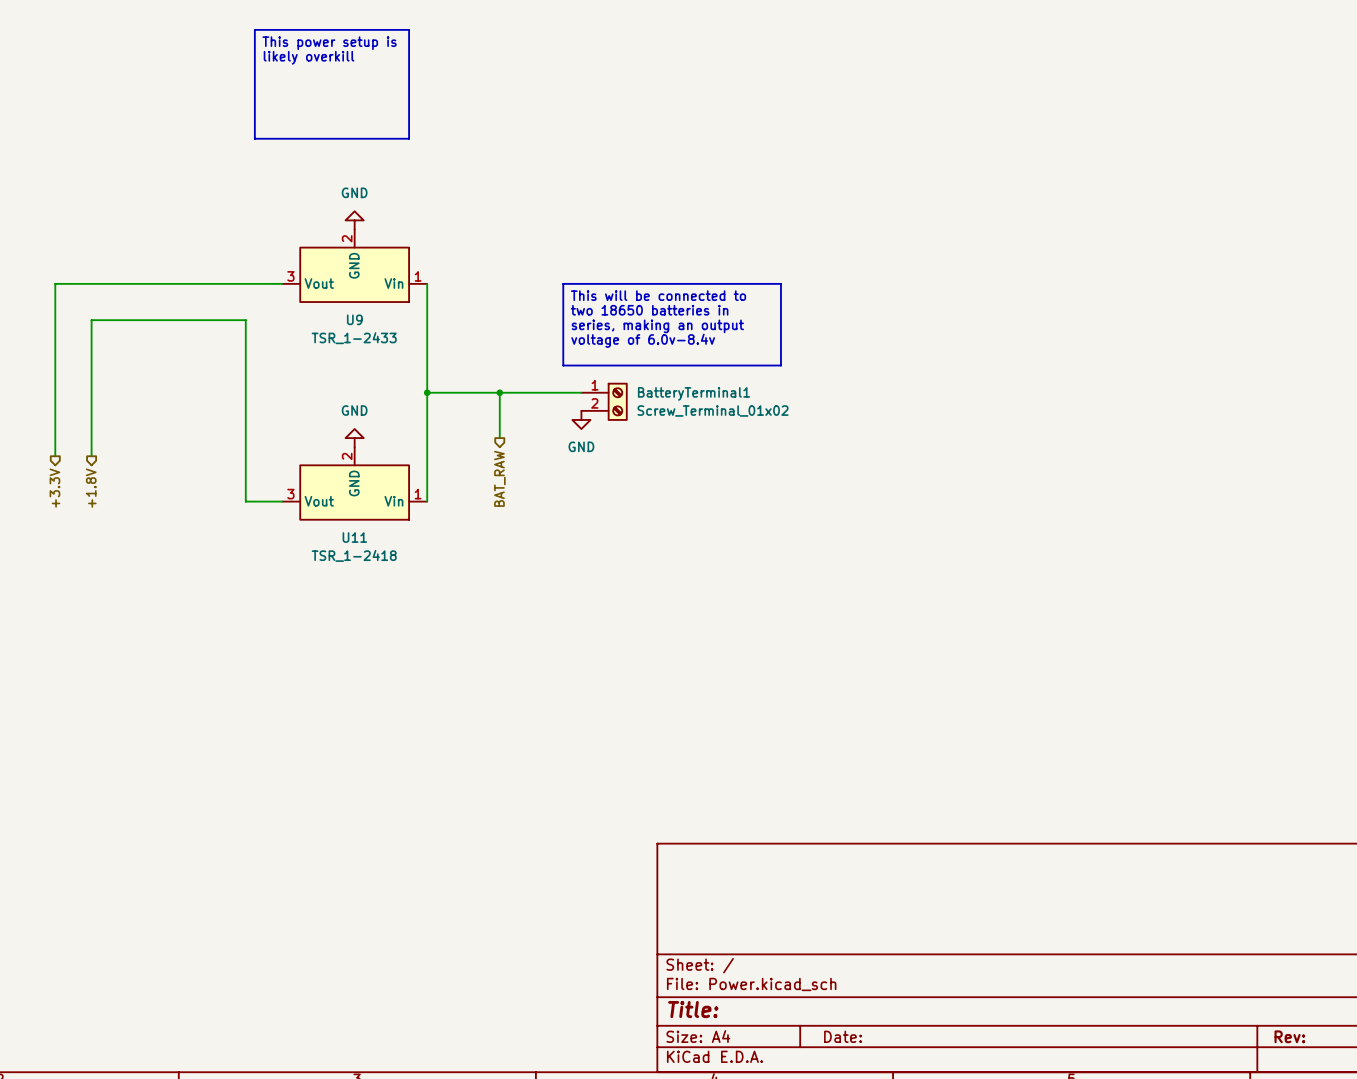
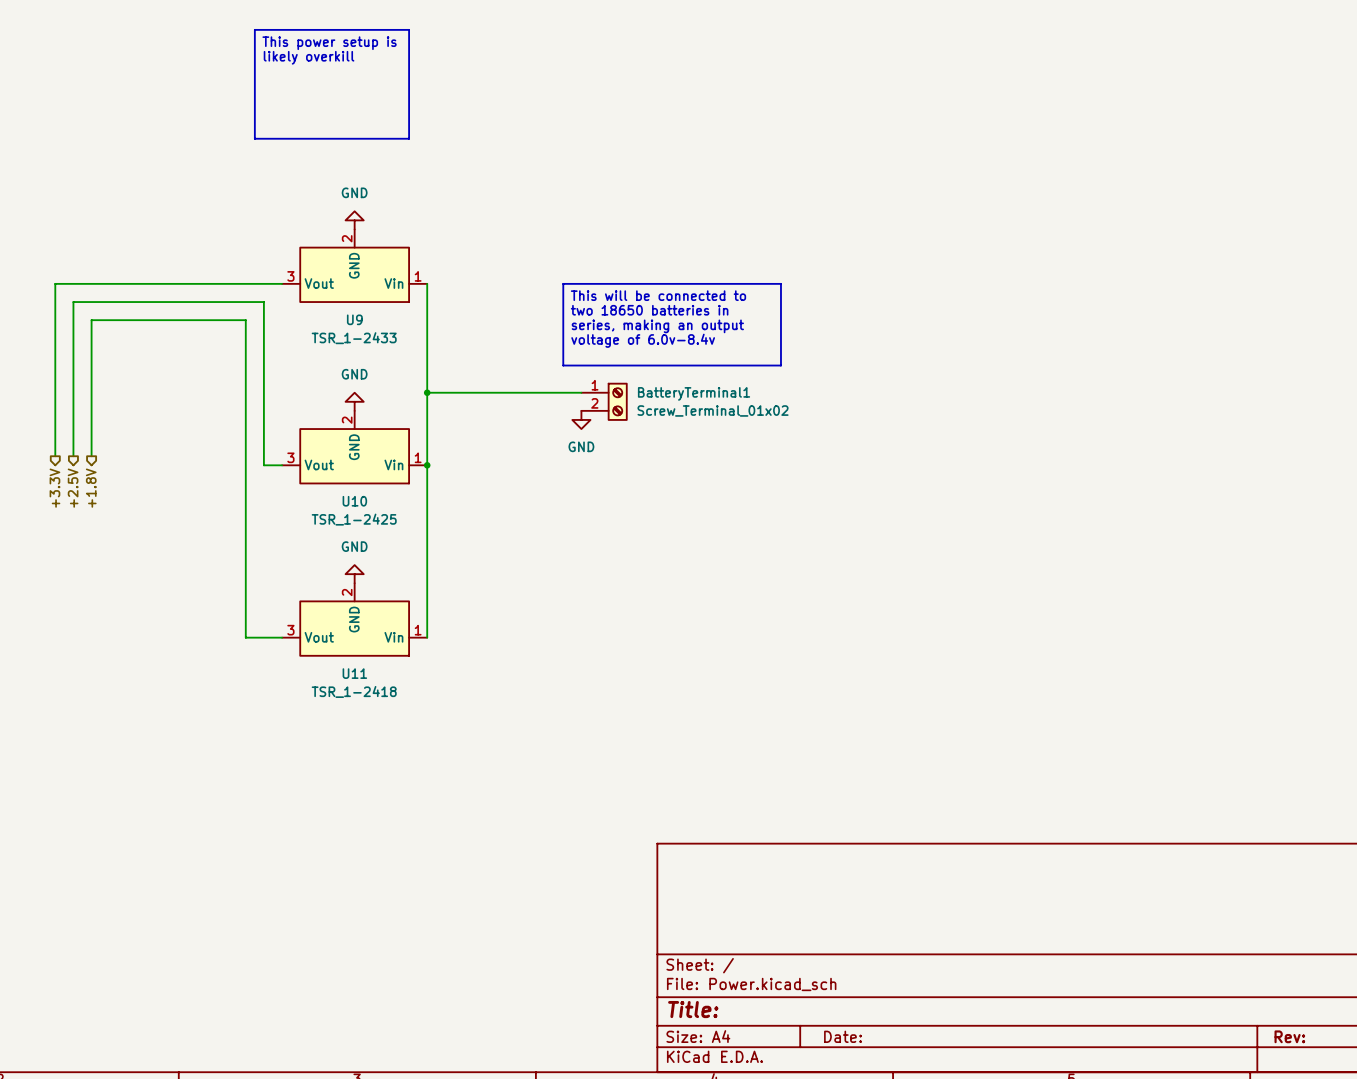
wire: (499, 392) (499, 438) -> none
junction: (499, 392) -> none
power symbol position: GND (354, 438) -> GND (354, 401)
U10: none -> TSR_1-2425 (354, 447)
wire: none -> (73, 456) (73, 302) (263, 302) (263, 465) (282, 465)
junction: none -> (427, 465)
hierarchical label: BAT_RAW (499, 478) -> none
U11 position: (354, 483) -> (354, 619)
hierarchical label: none -> +2.5V (73, 488)
wire: (245, 501) (282, 501) -> (245, 501) (245, 637) (282, 637)
wire: none -> (427, 501) (427, 637)
power symbol: none -> GND (354, 574)

